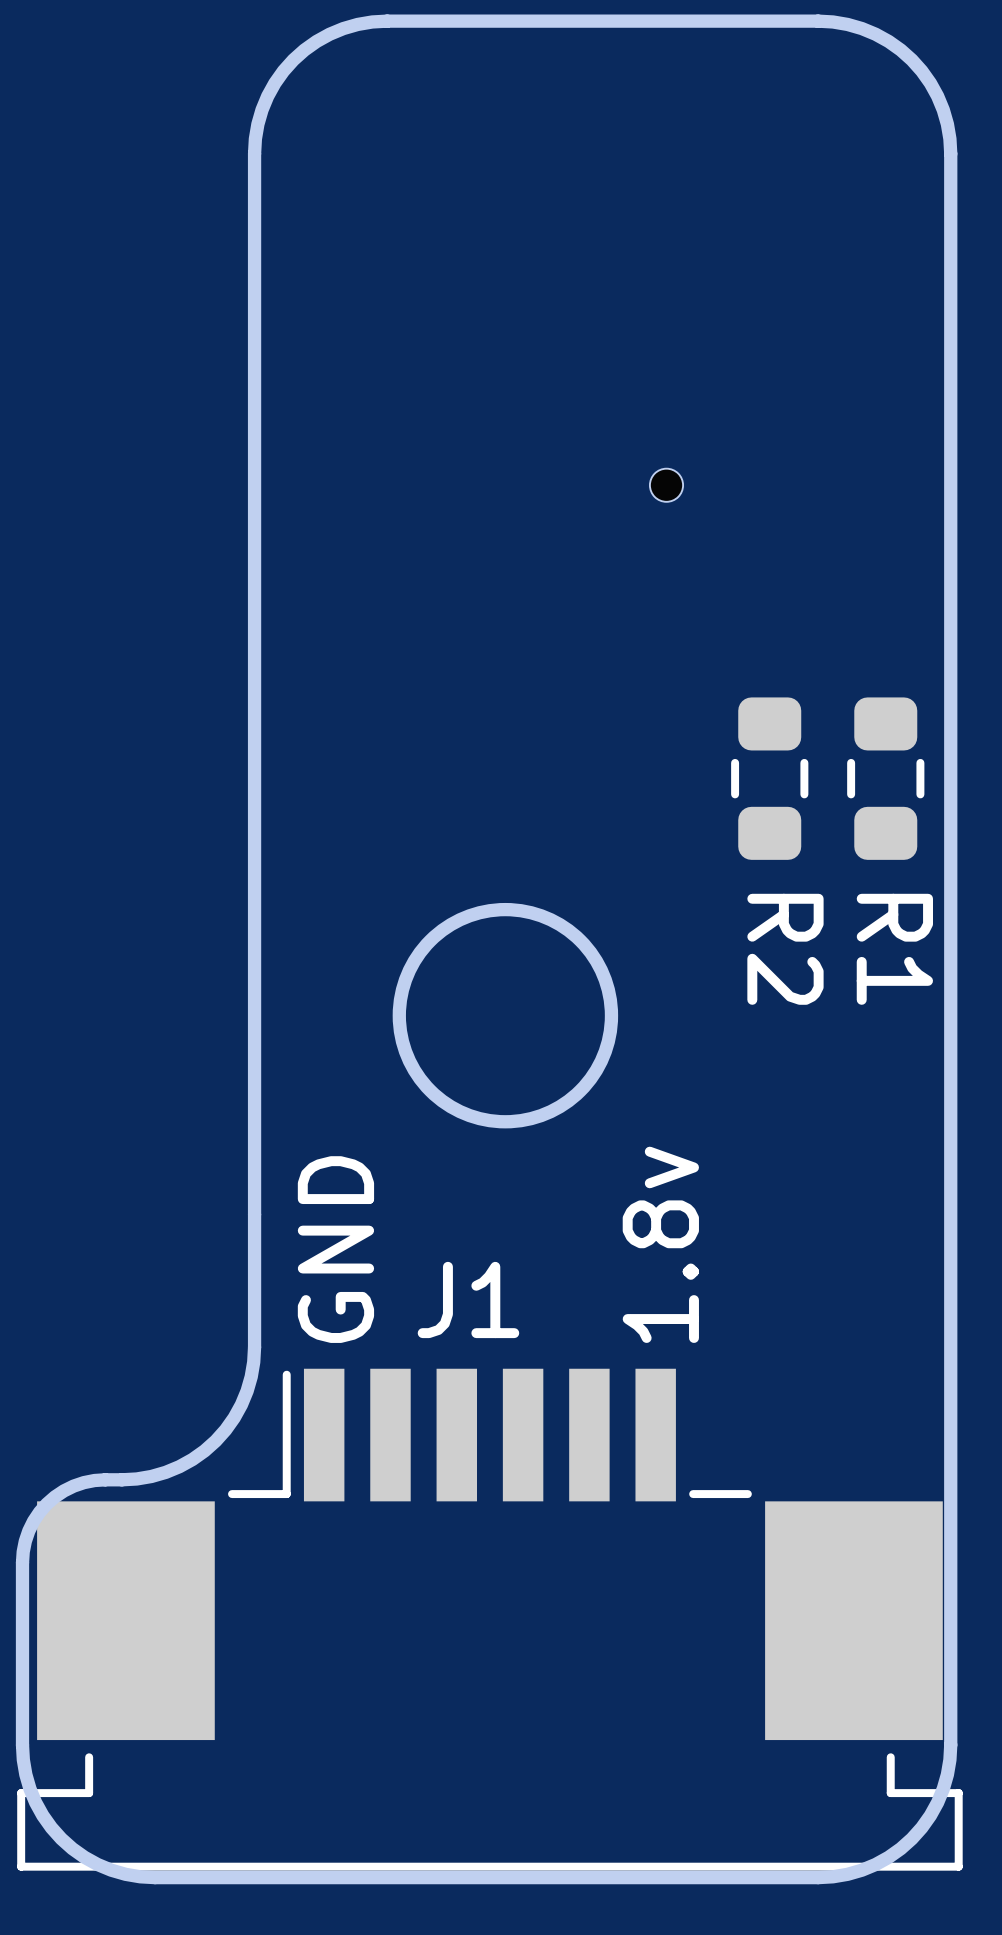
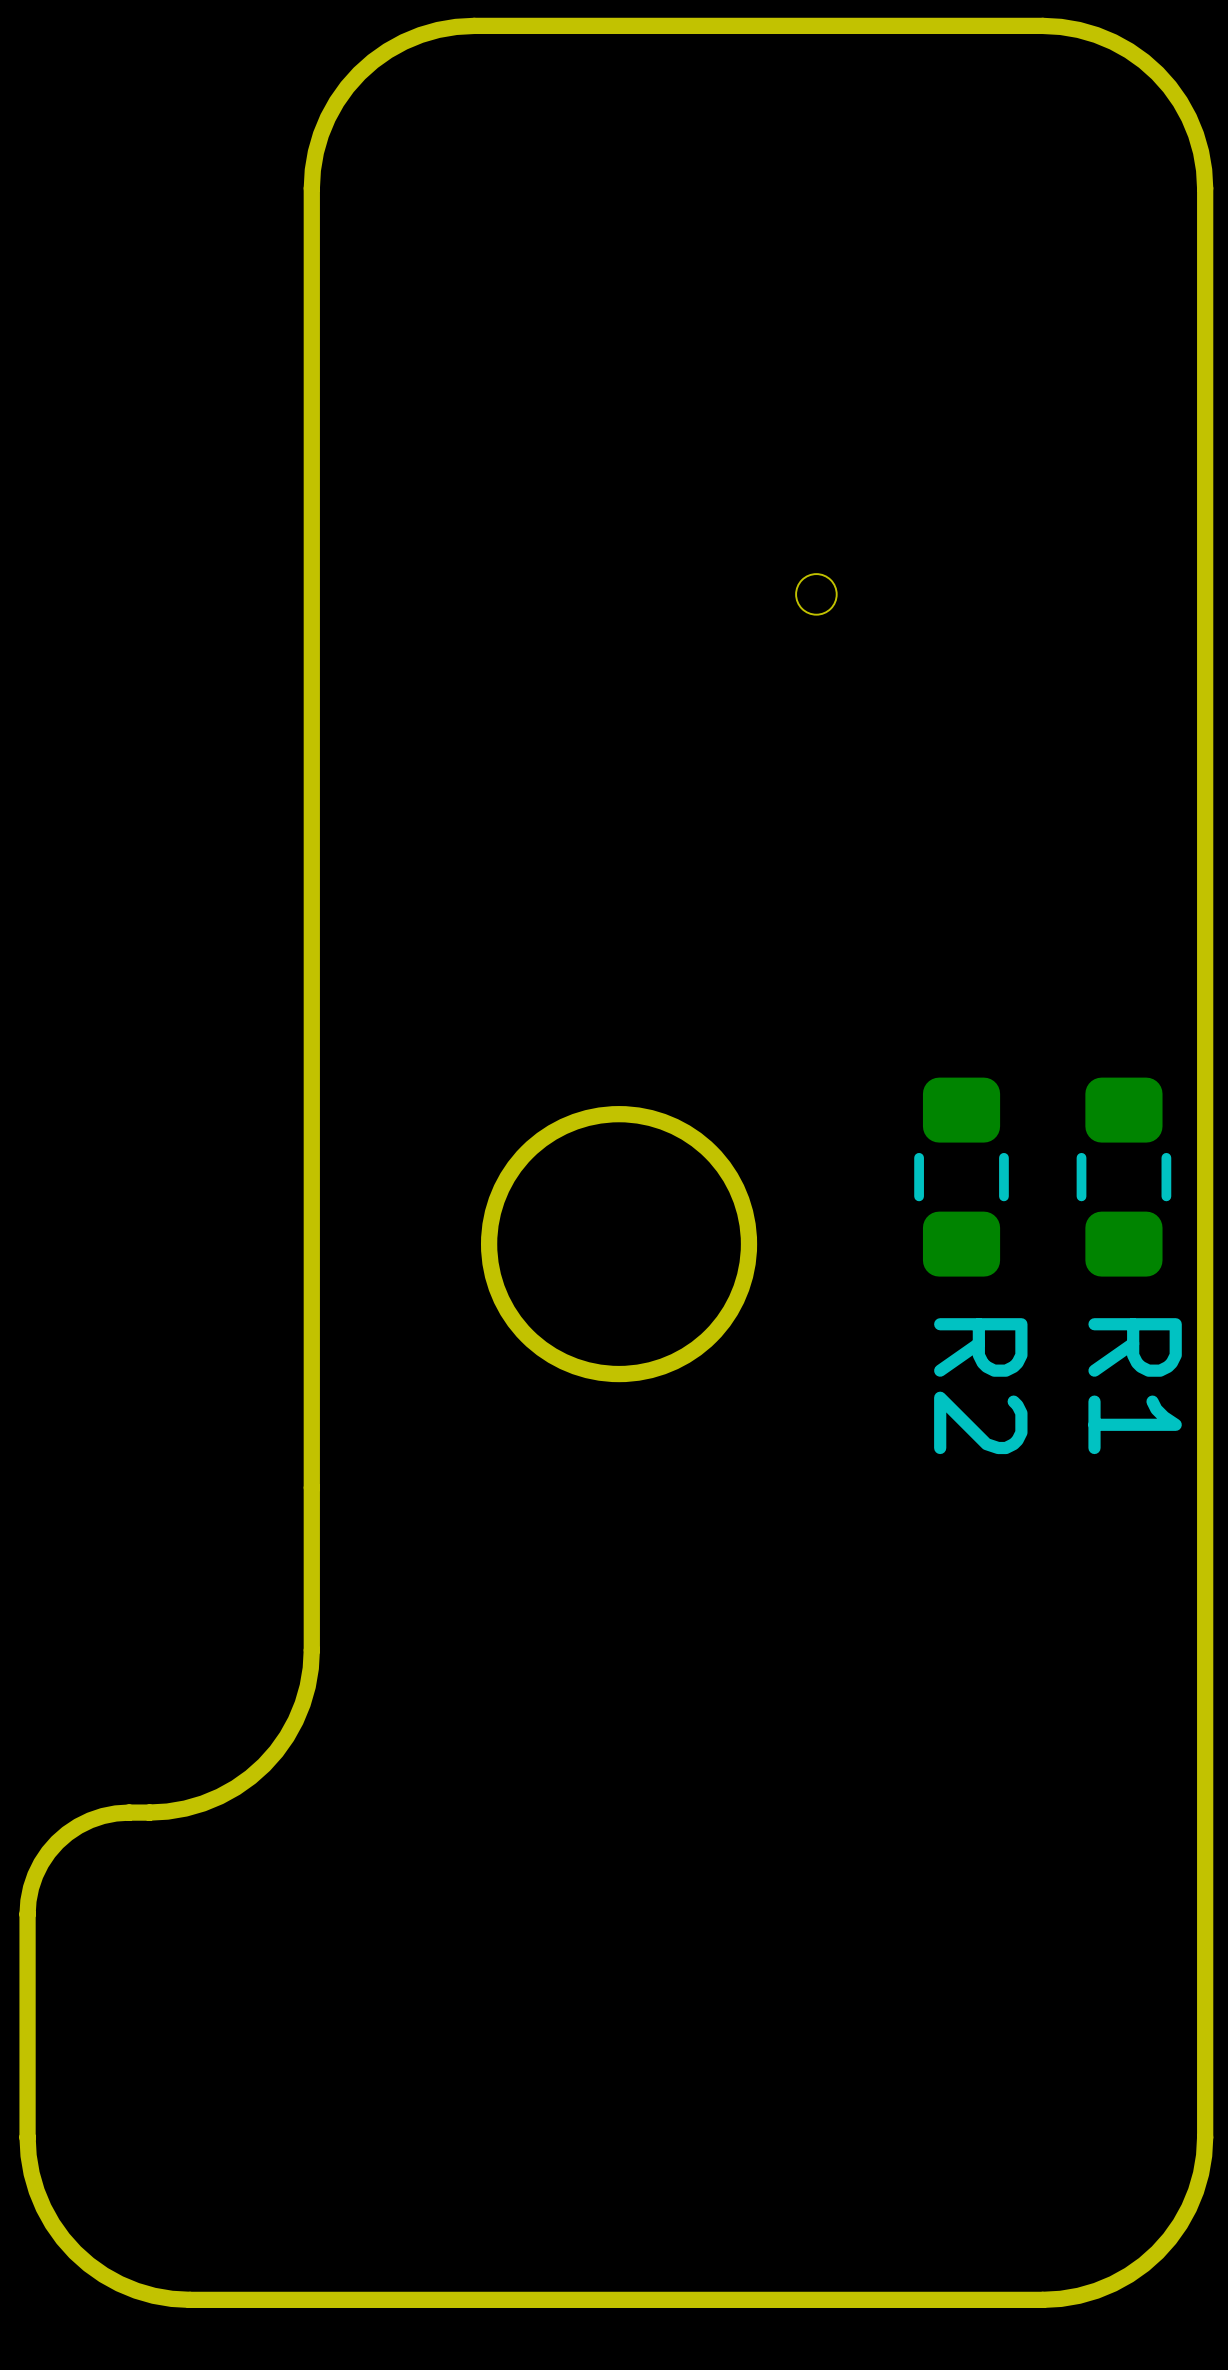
board edge: (818, 21) (847, 24) (875, 34) (900, 50) (911, 59) (930, 83) (943, 109) (947, 124) (950, 153) (949, 1759) (943, 1788) (937, 1802) (930, 1815) (911, 1838) (888, 1857) (861, 1870) (832, 1876) (818, 1877) -> (1002, 25) (1042, 25) (1078, 29) (1113, 41) (1144, 61) (1169, 87) (1189, 117) (1201, 152) (1205, 188) (1204, 2155) (1196, 2191) (1189, 2207) (1169, 2238) (1144, 2264) (1113, 2283) (1078, 2295) (1042, 2299) (1002, 2299)
R2 position: (769, 778) -> (961, 1177)
R1 position: (885, 778) -> (1123, 1177)
text: 1.8v (660, 1244) -> none
text: GND (335, 1249) -> none
J1: (489, 1619) -> none

